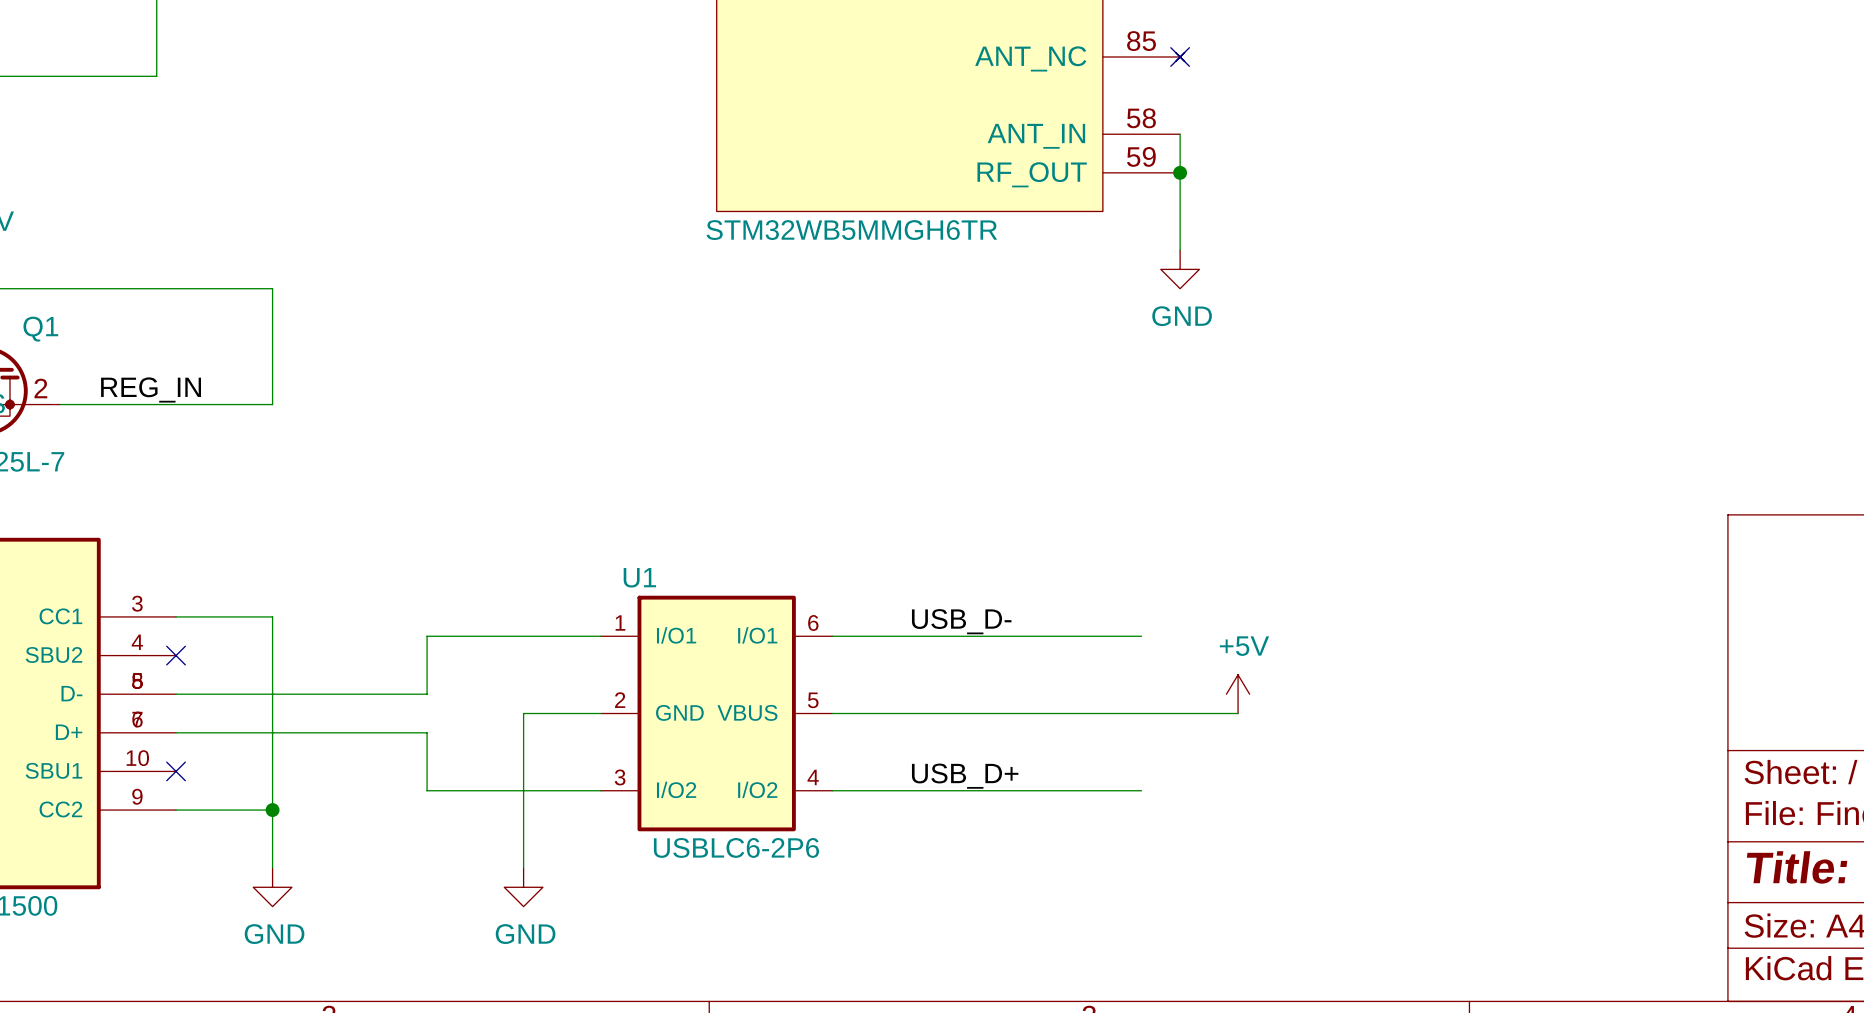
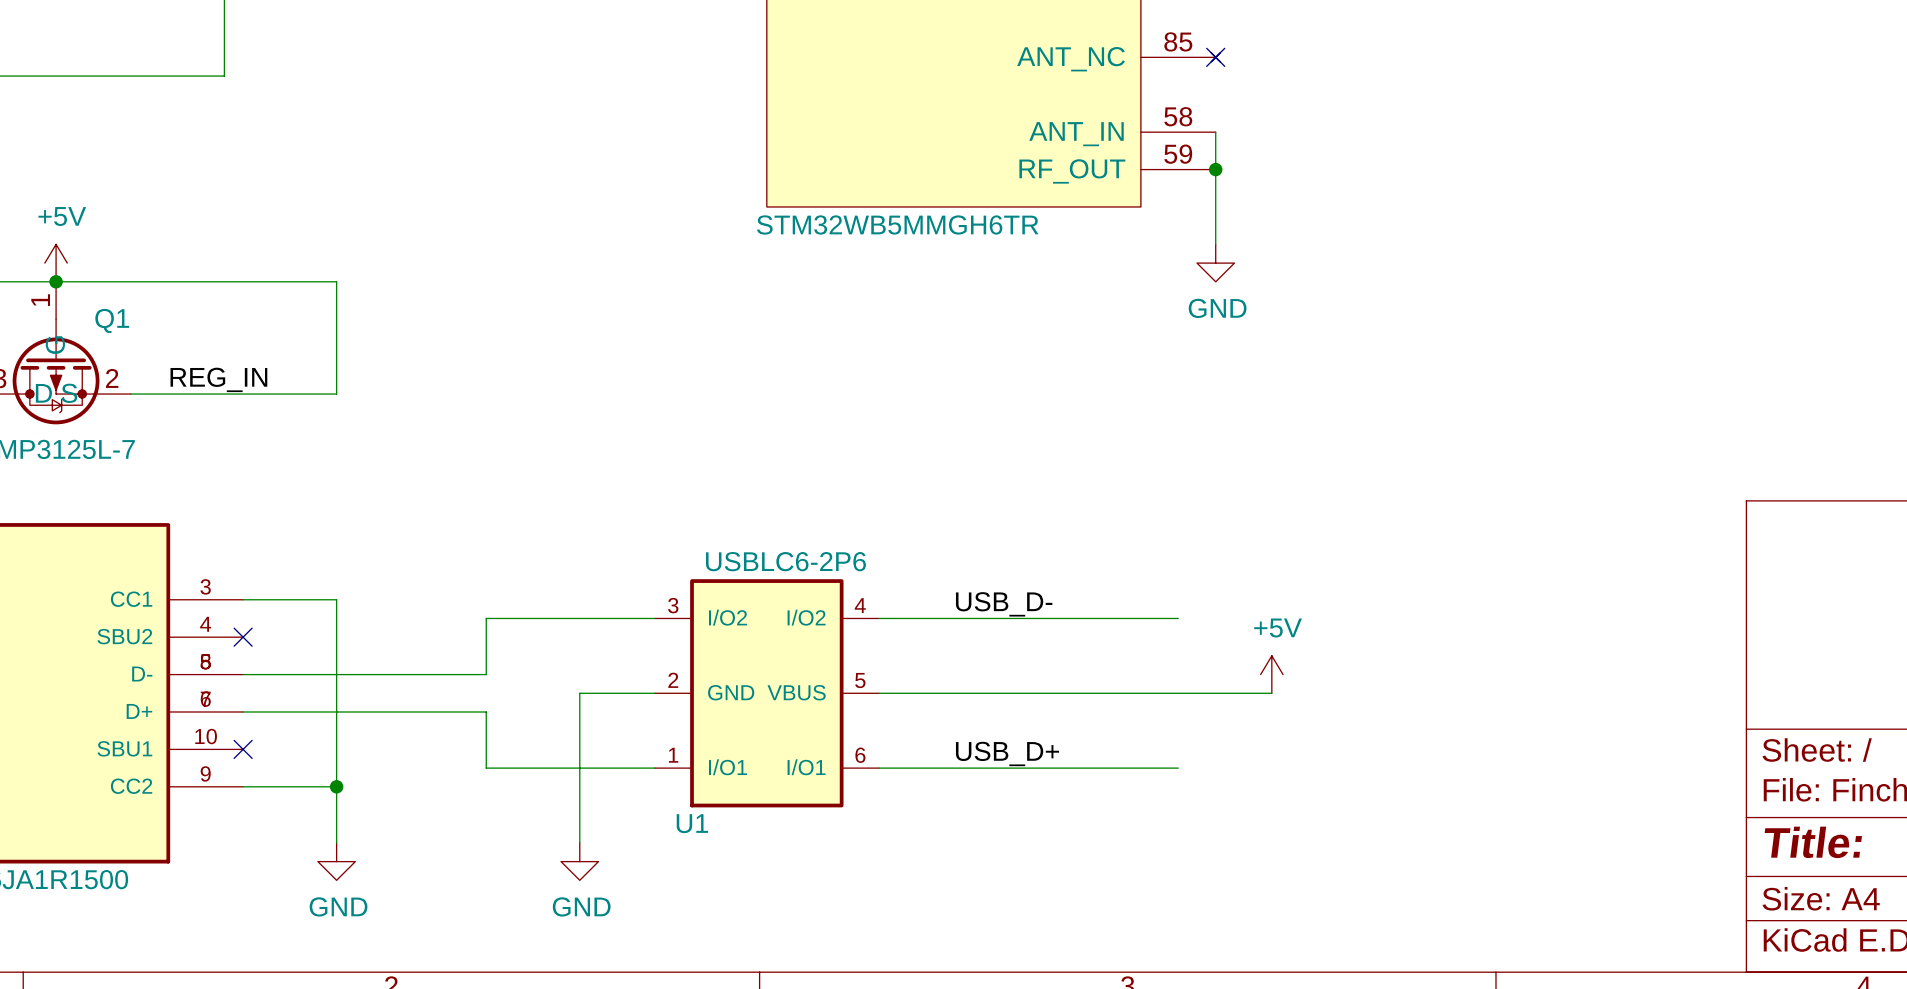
U1 flip: as is (716, 713) -> up-down (766, 693)

